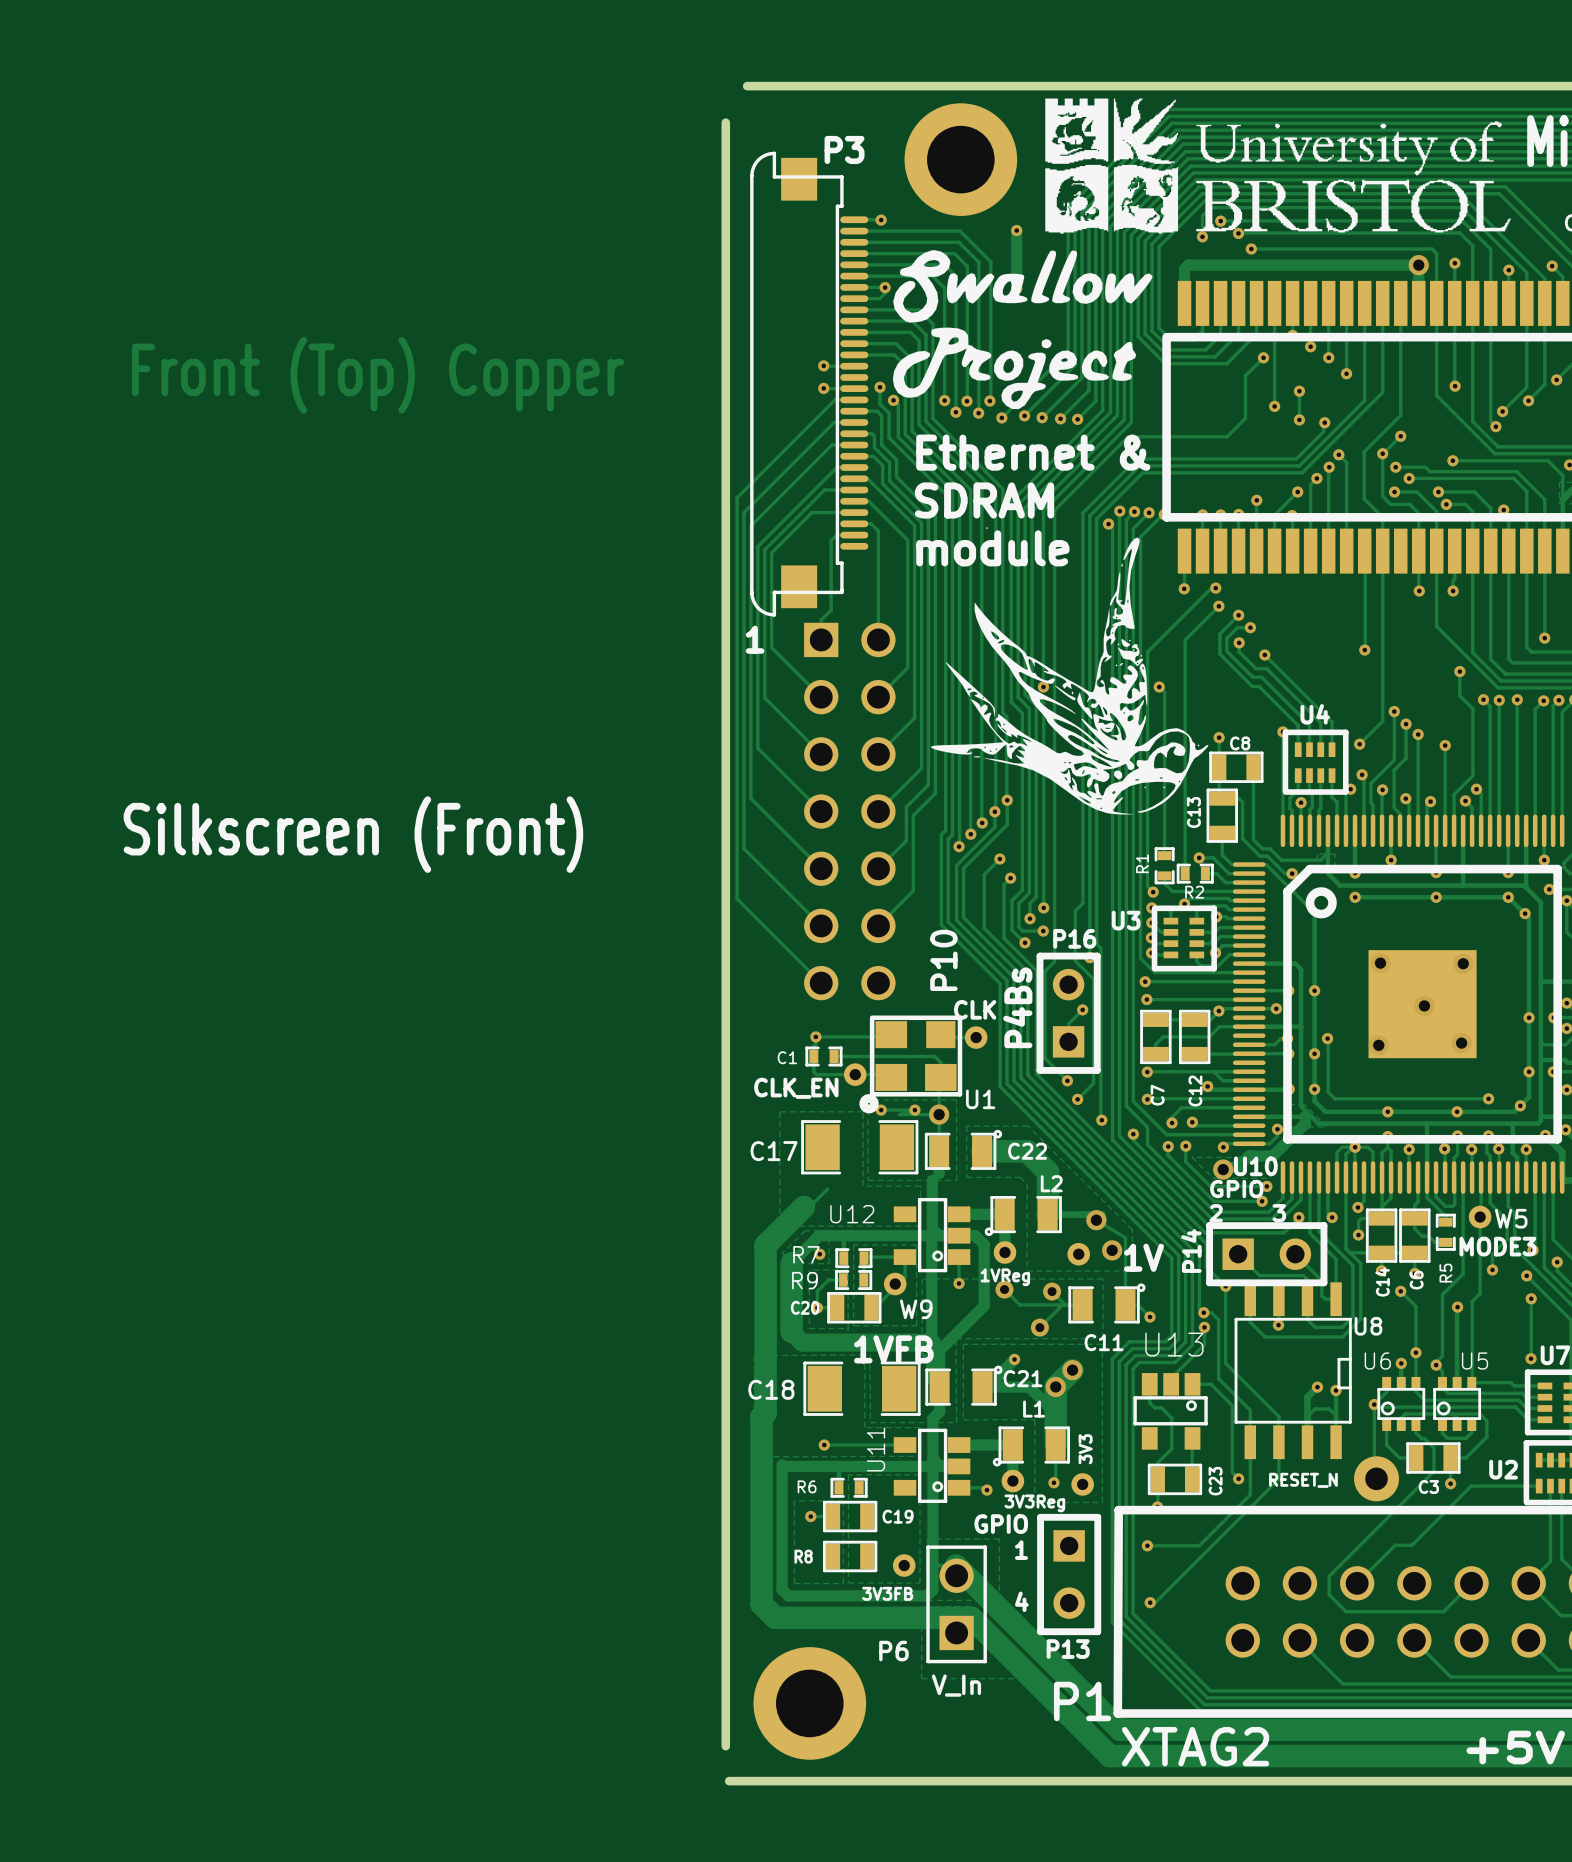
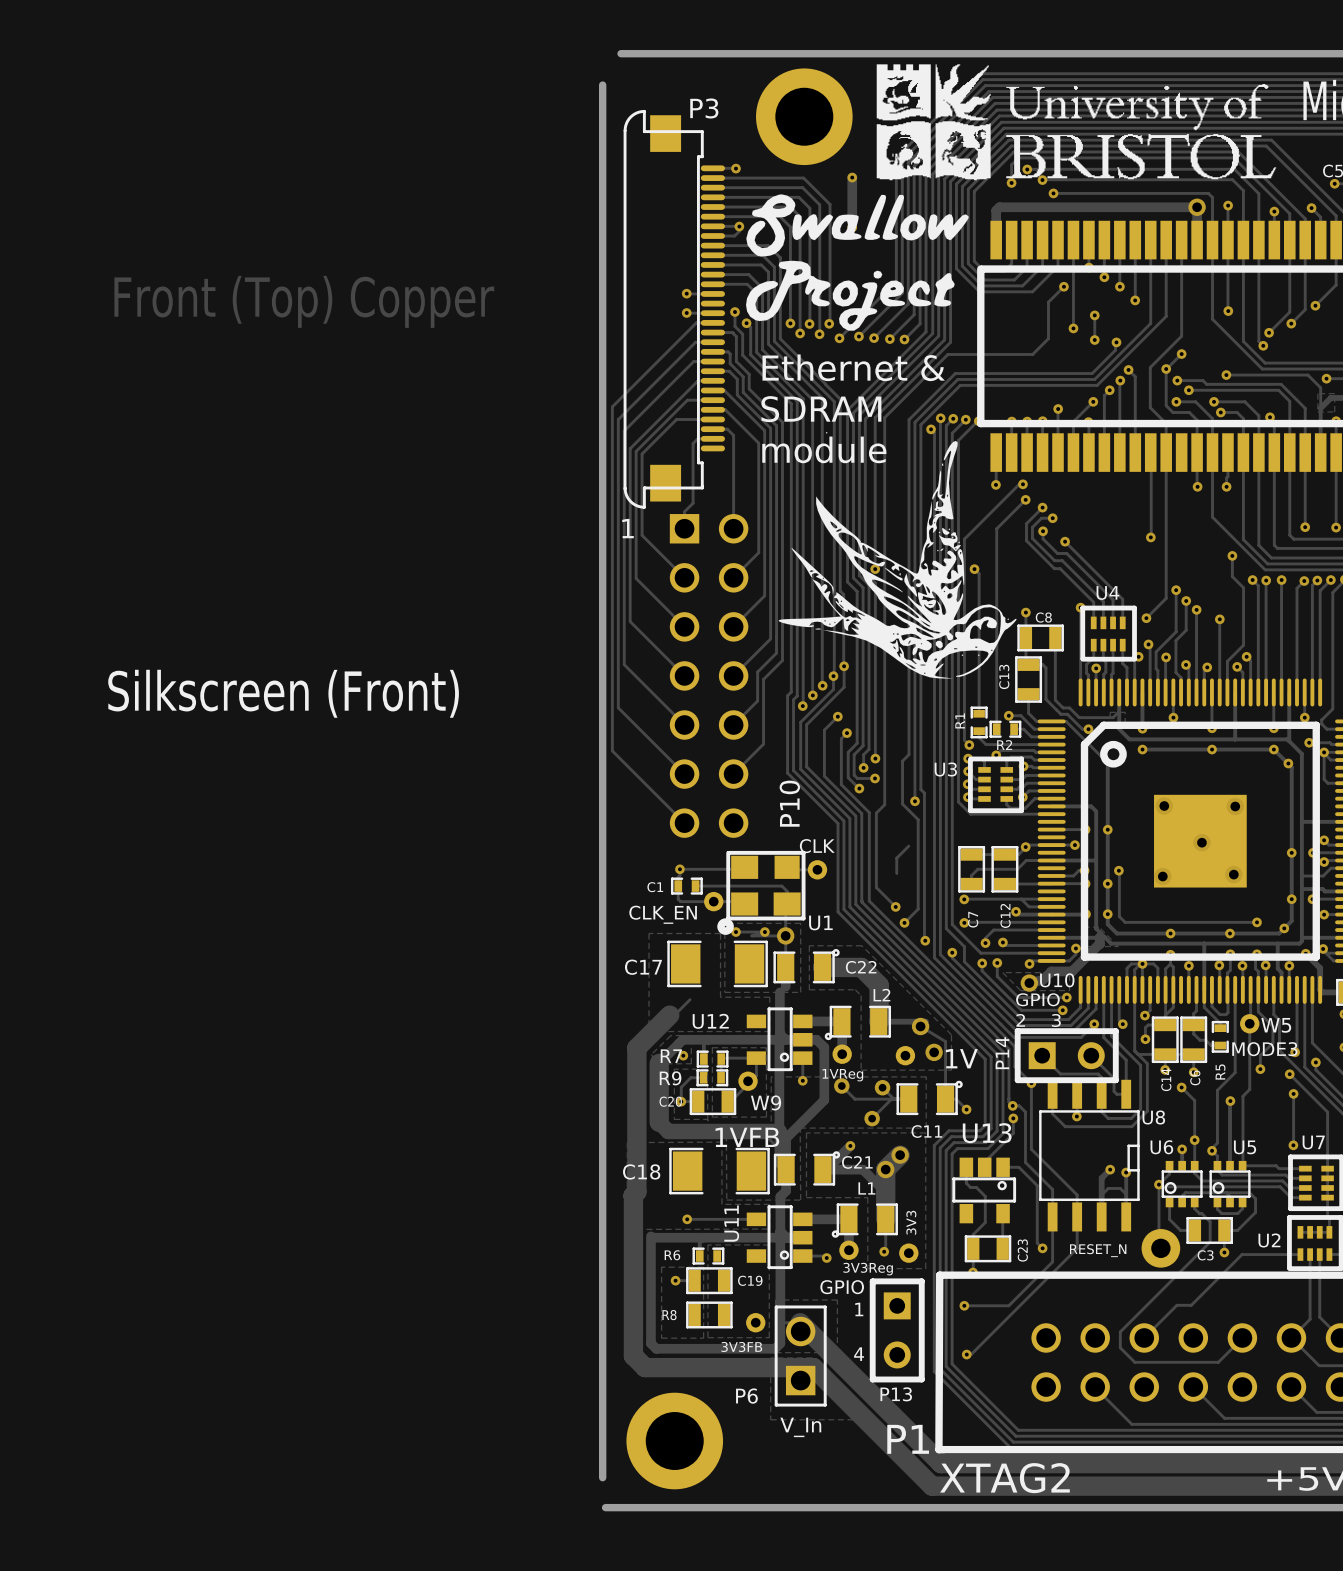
track: (1145, 981) (1249, 981) -> none
via: (1145, 981) -> none
track: (1146, 999) (1249, 999) -> none
via: (1146, 999) -> none
text: P4Bs (1017, 1007) -> none
via: (1082, 1009) -> none
P16: (1068, 1013) -> none

